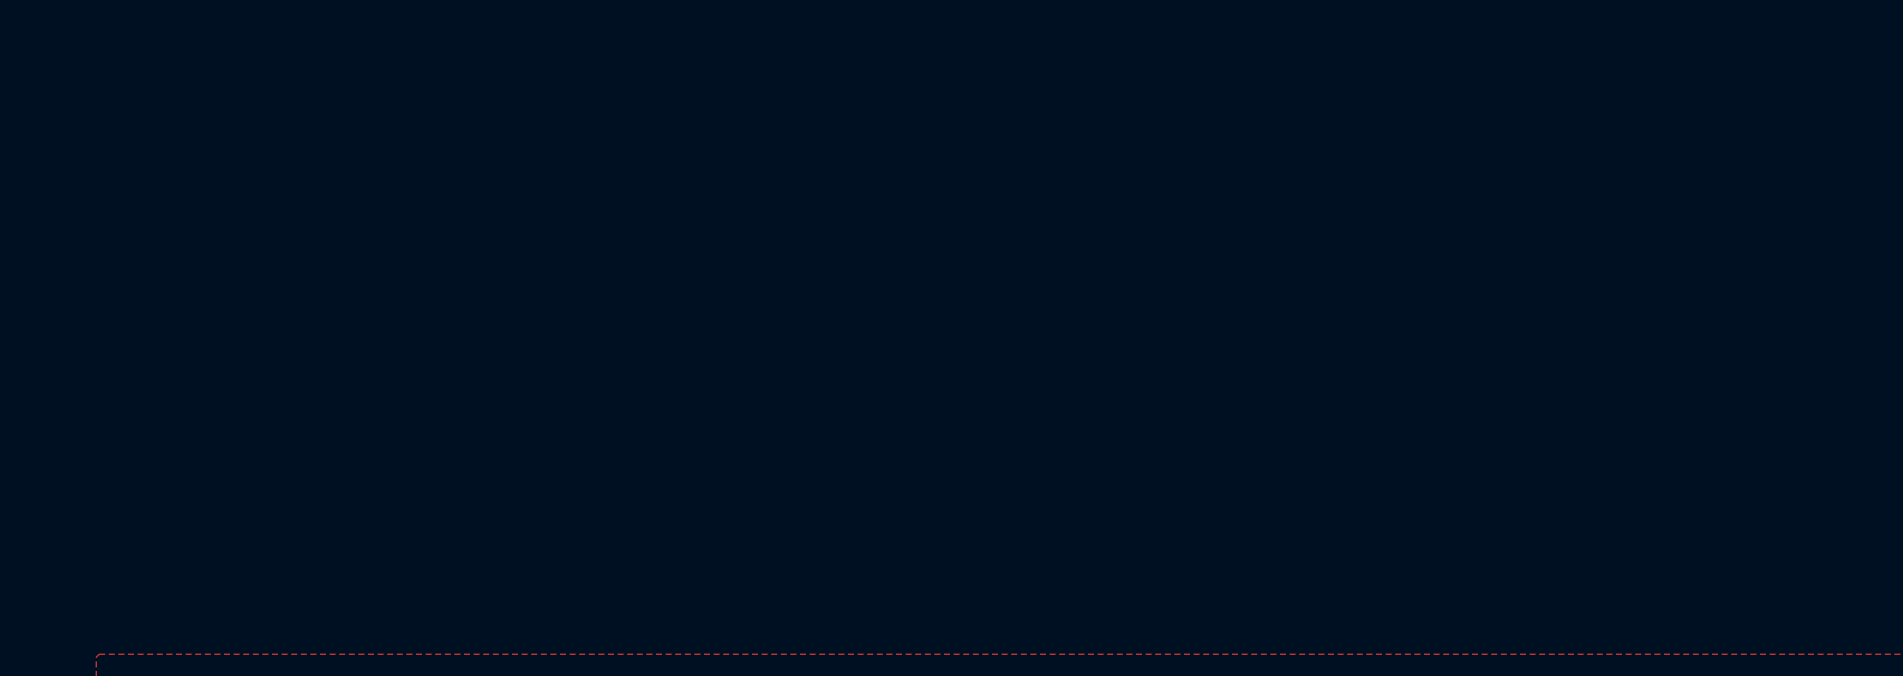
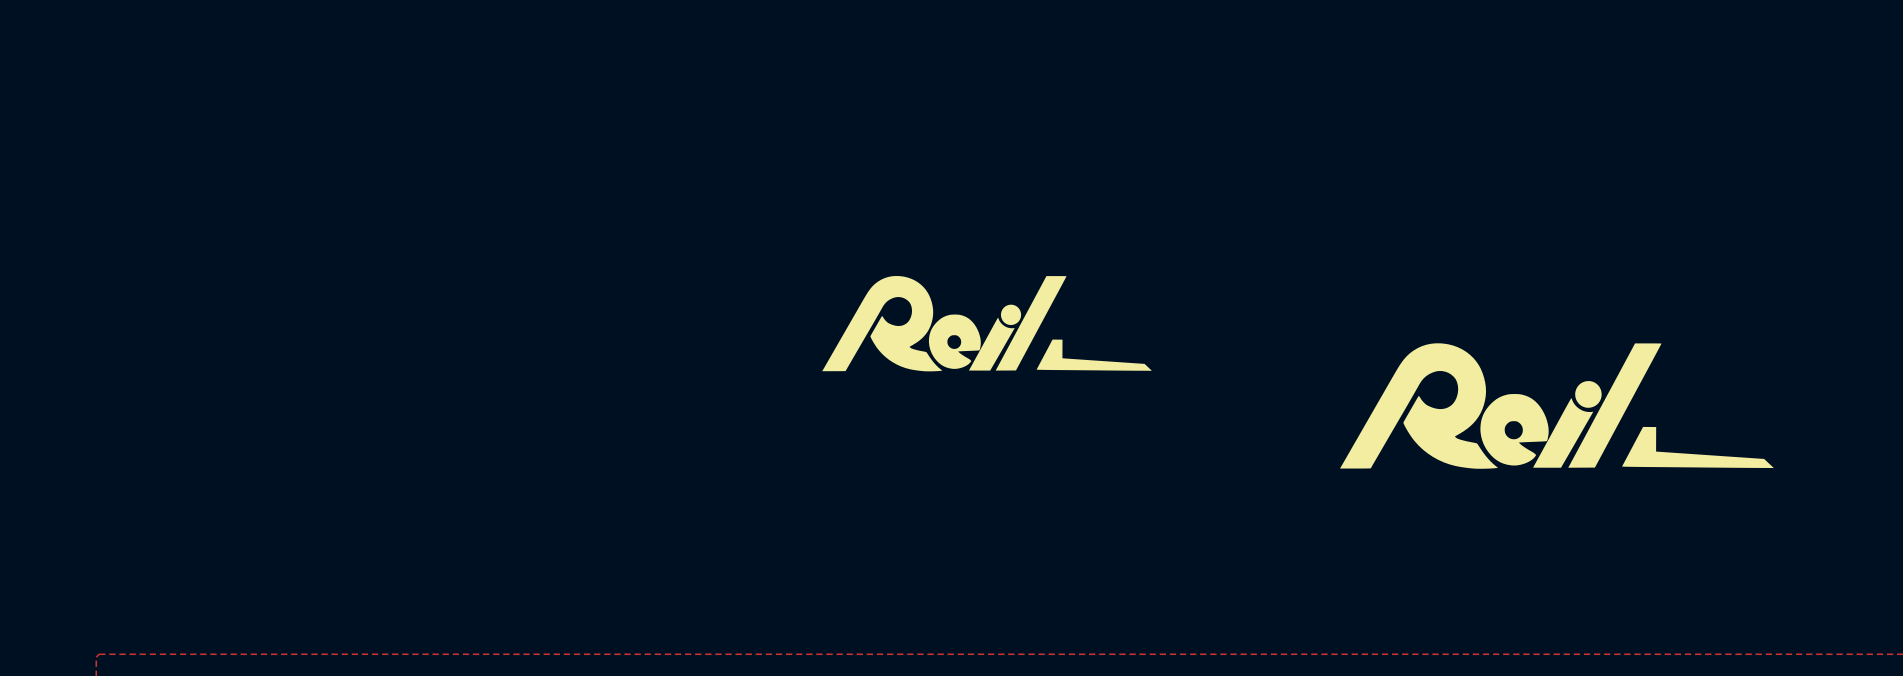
drawing: none -> [822, 276, 1152, 372]
drawing: none -> [1340, 343, 1774, 469]

